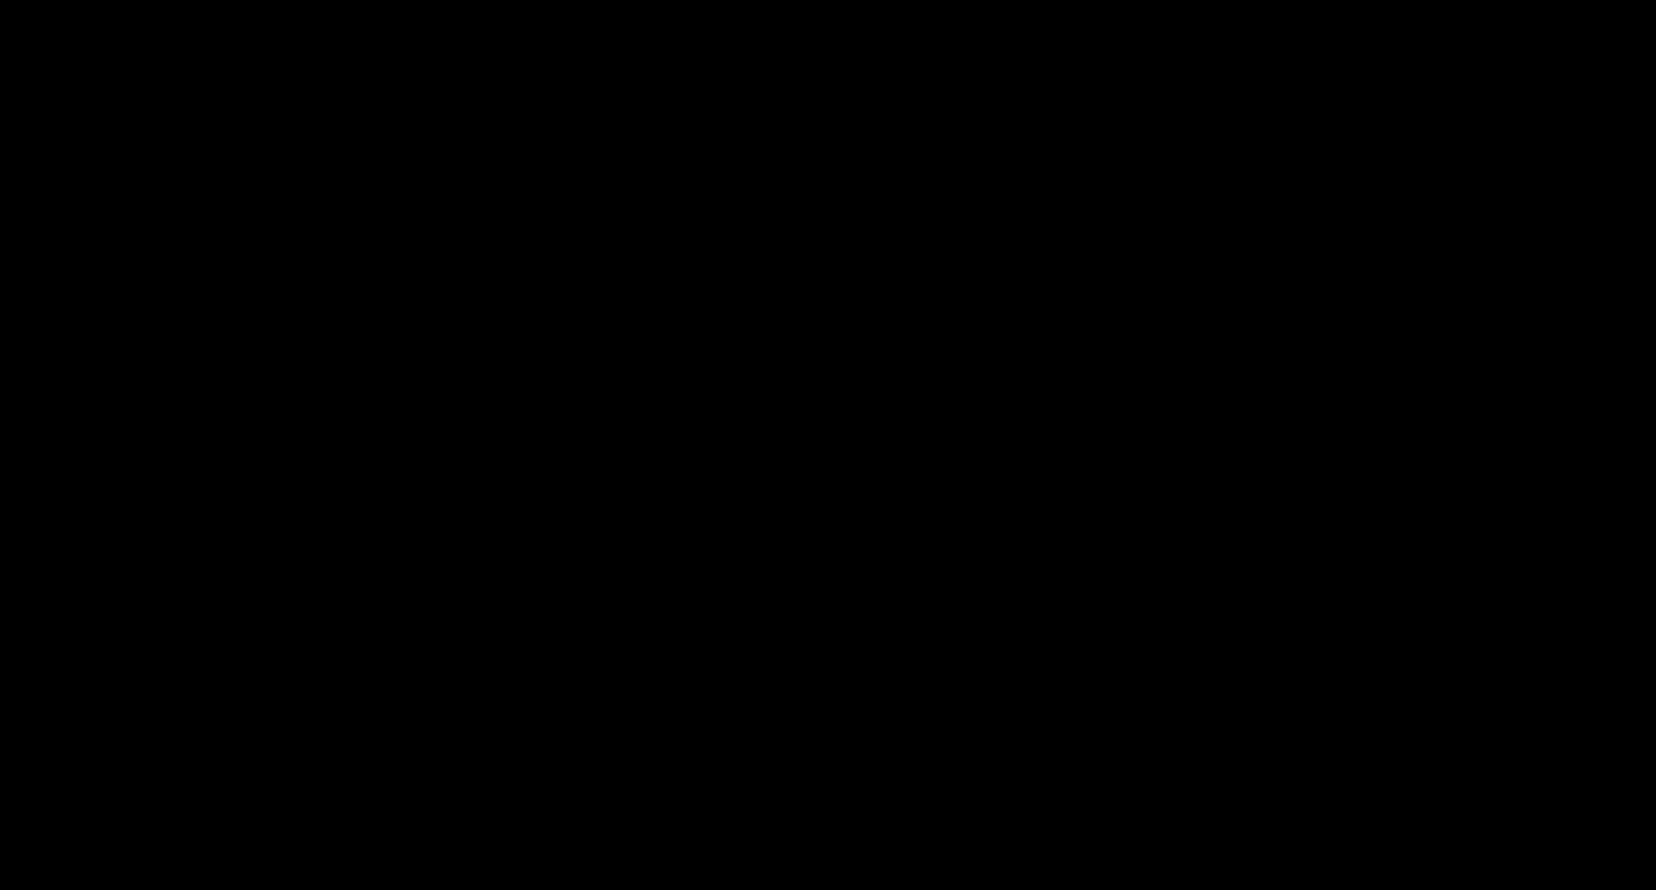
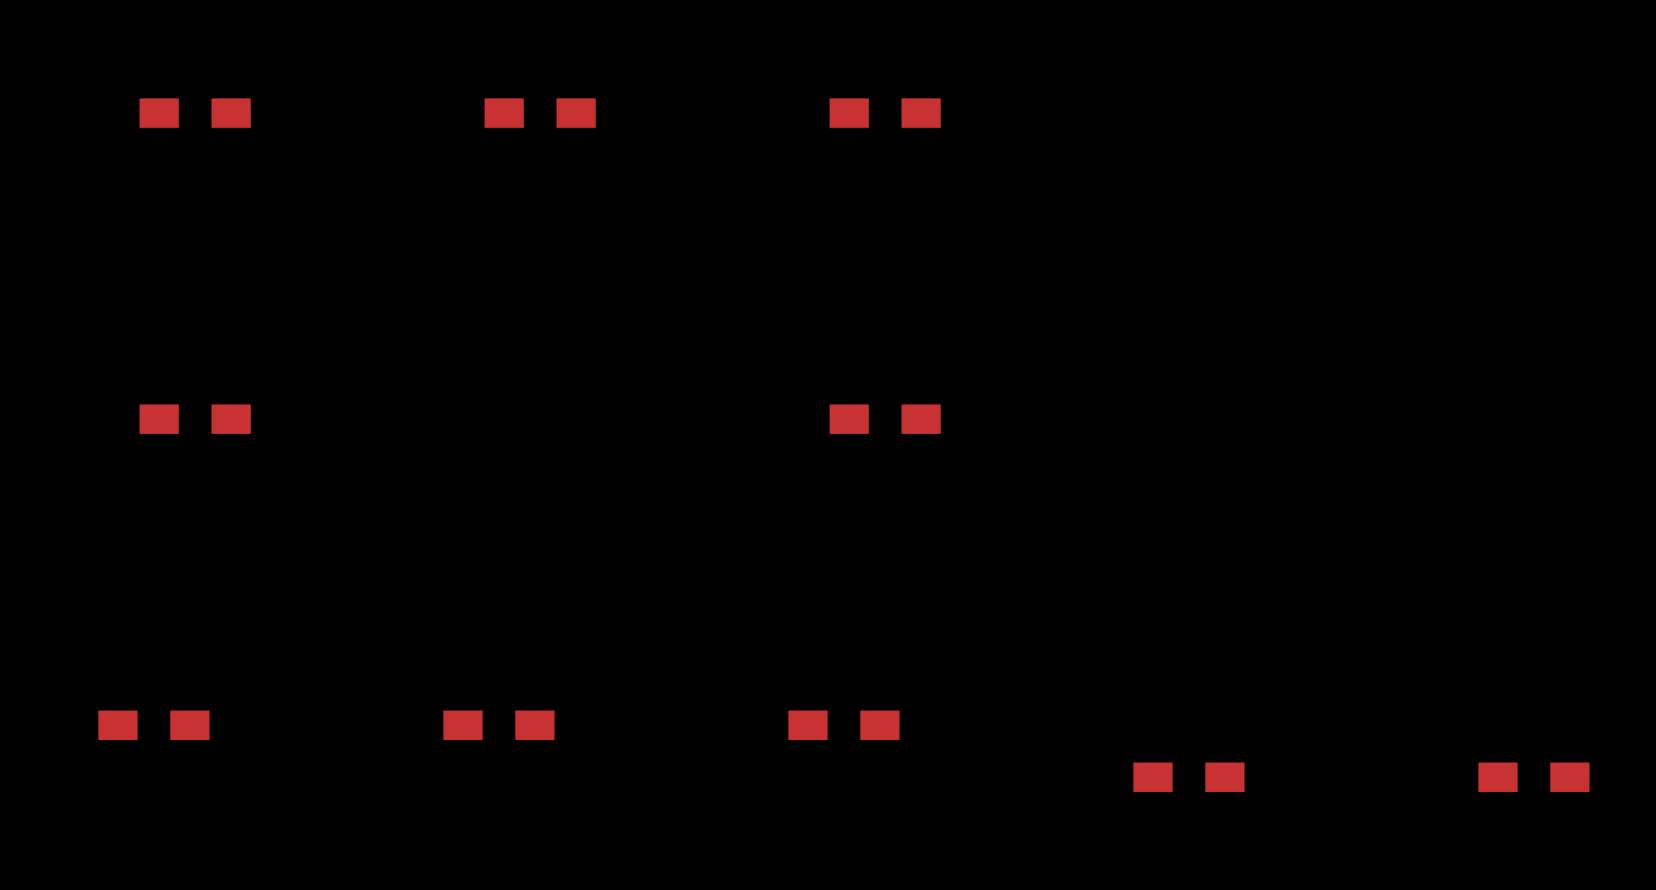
part: none -> (195, 113)
part: none -> (540, 113)
part: none -> (885, 113)
part: none -> (195, 419)
part: none -> (885, 419)
part: none -> (153, 725)
part: none -> (498, 725)
part: none -> (843, 725)
part: none -> (1188, 777)
part: none -> (1533, 777)

